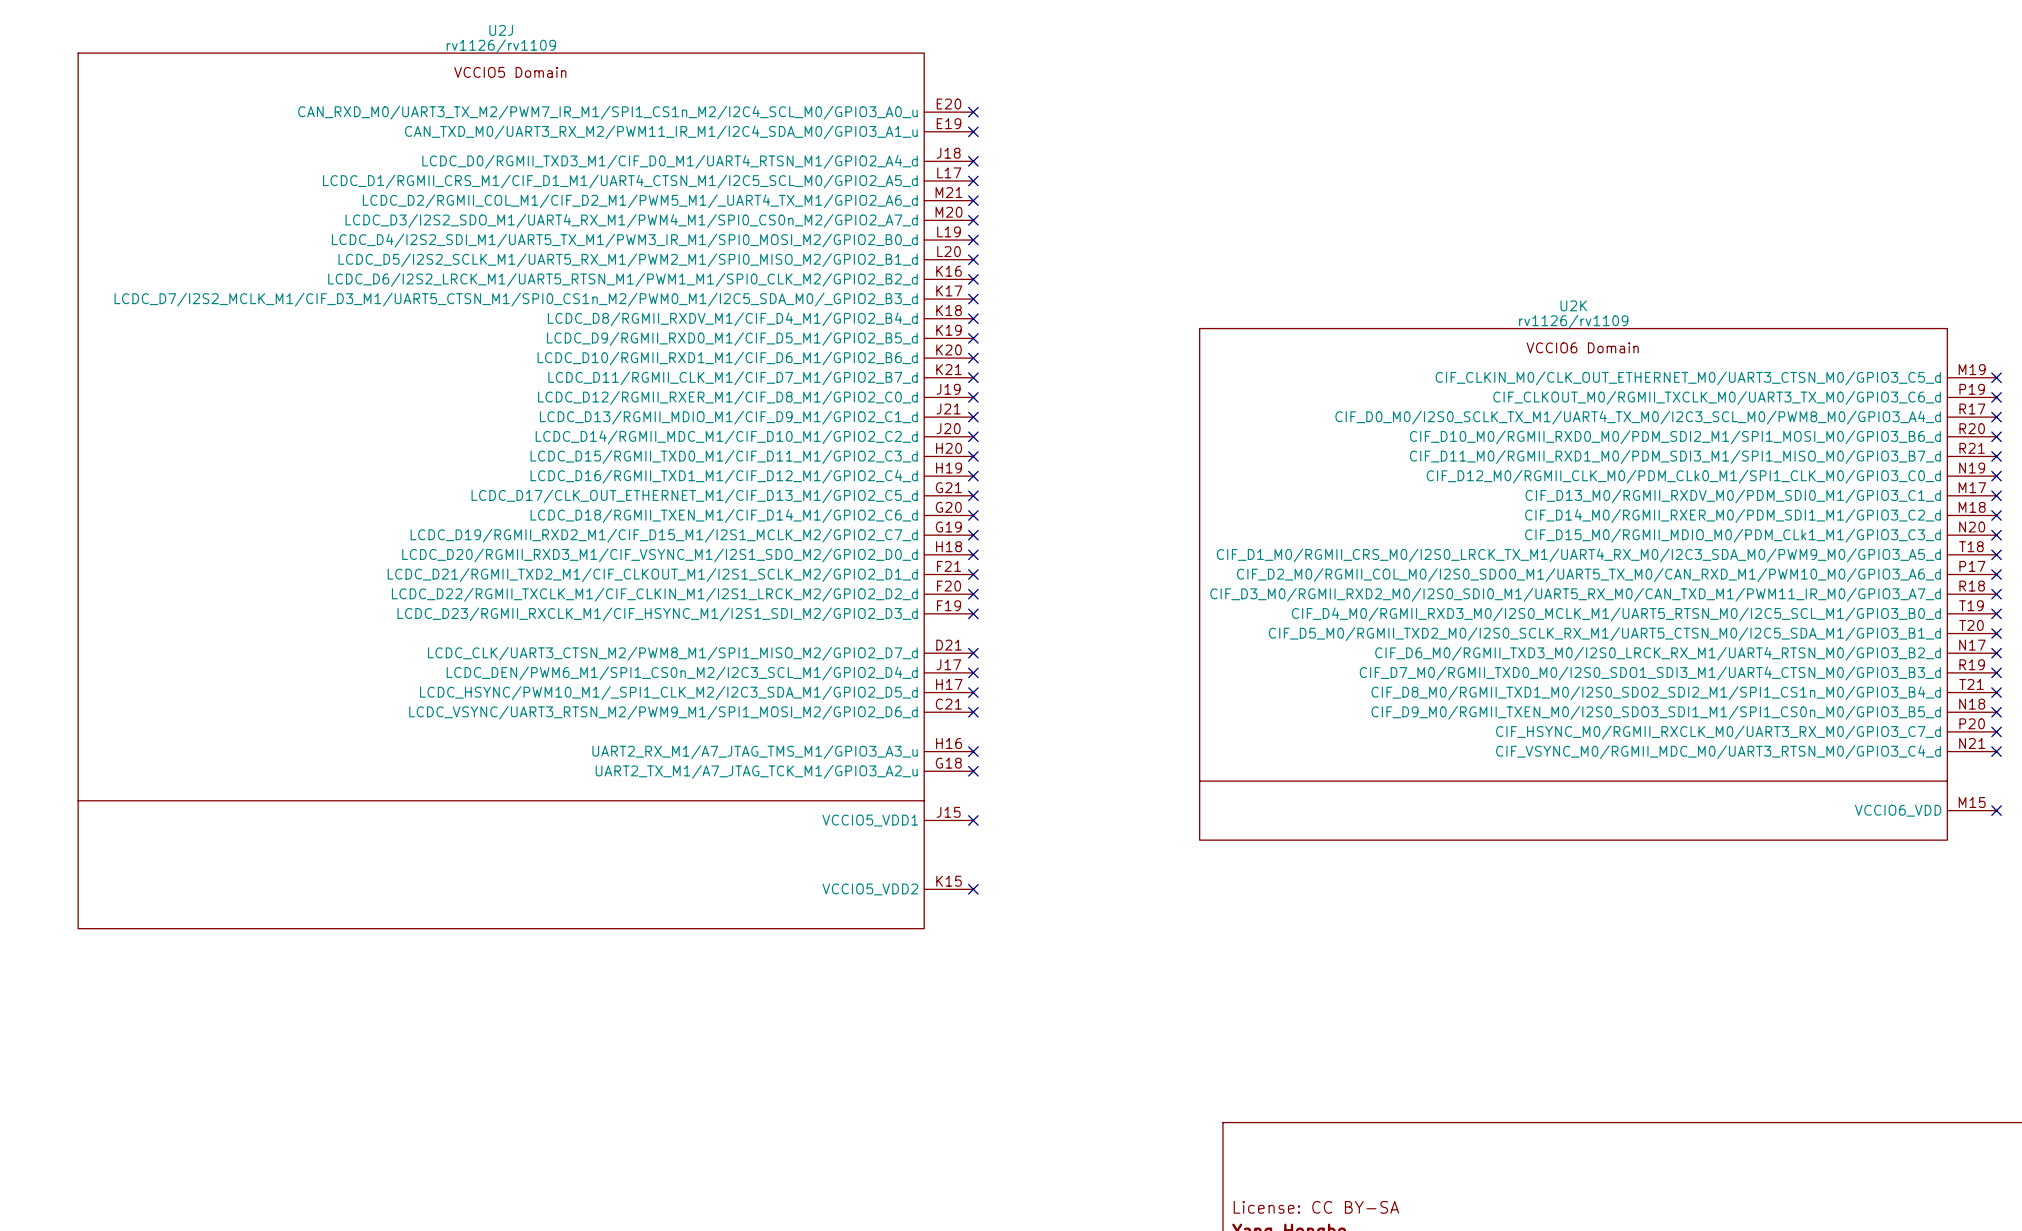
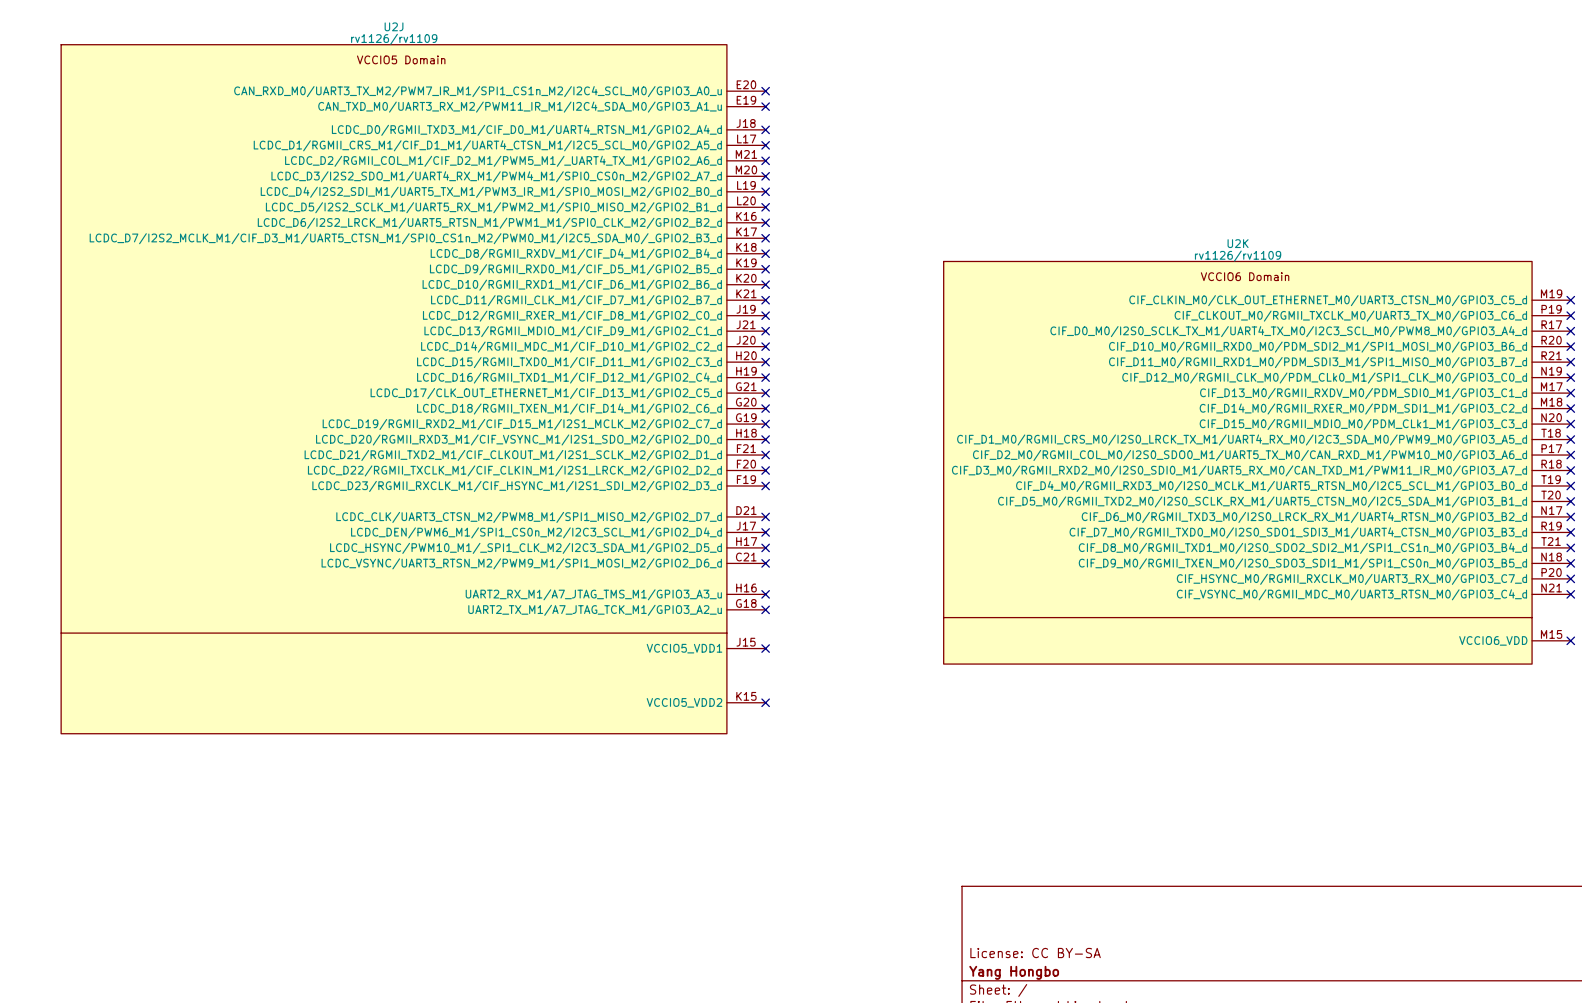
U2J symbol: [78, 53, 974, 929] -> [61, 44, 766, 734]
U2K symbol: [1199, 328, 1997, 841] -> [943, 261, 1571, 665]

